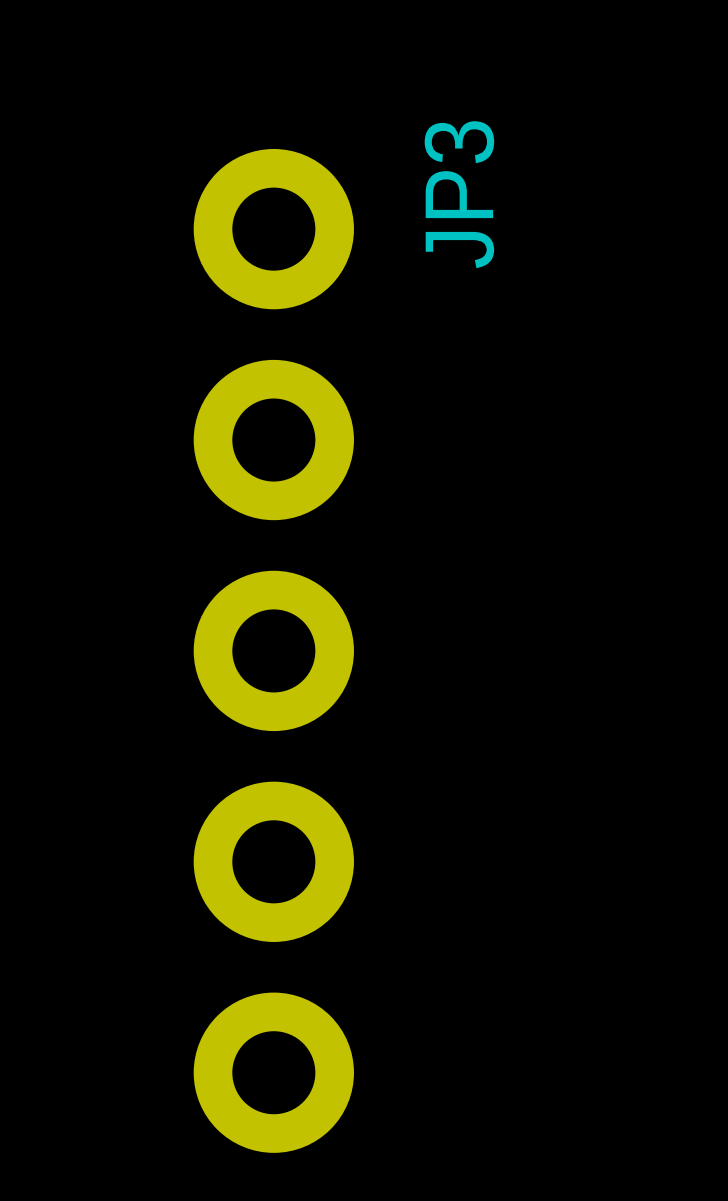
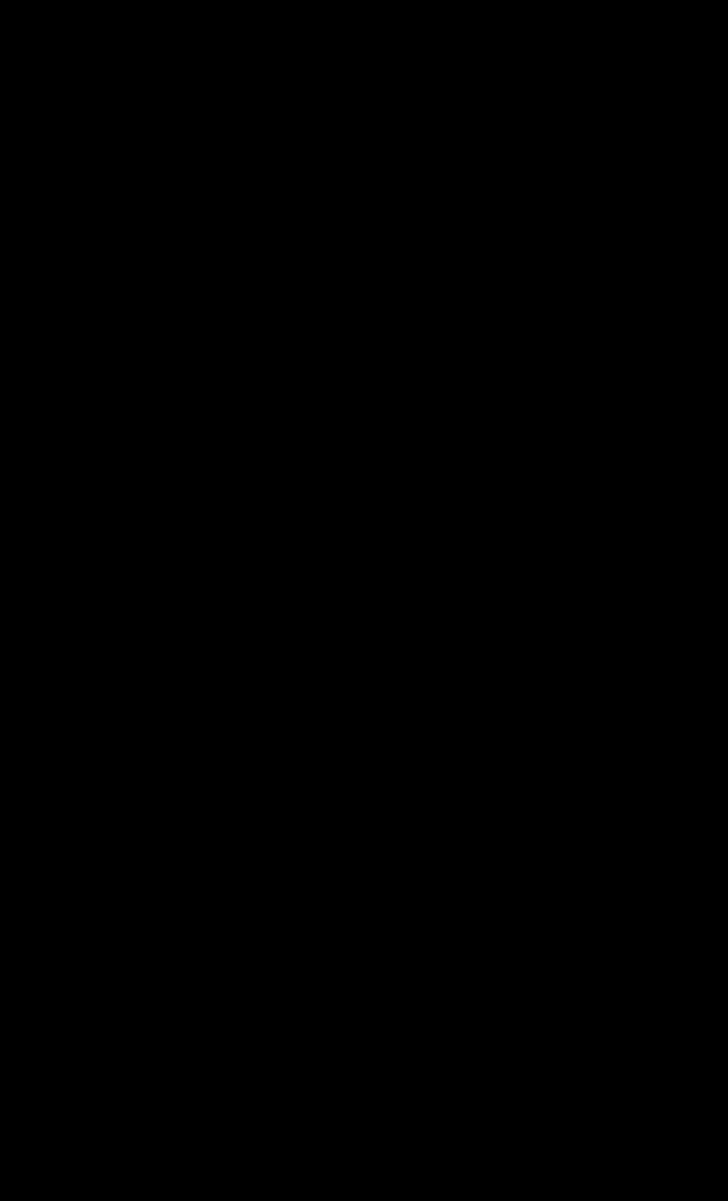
JP3: (273, 650) -> none

